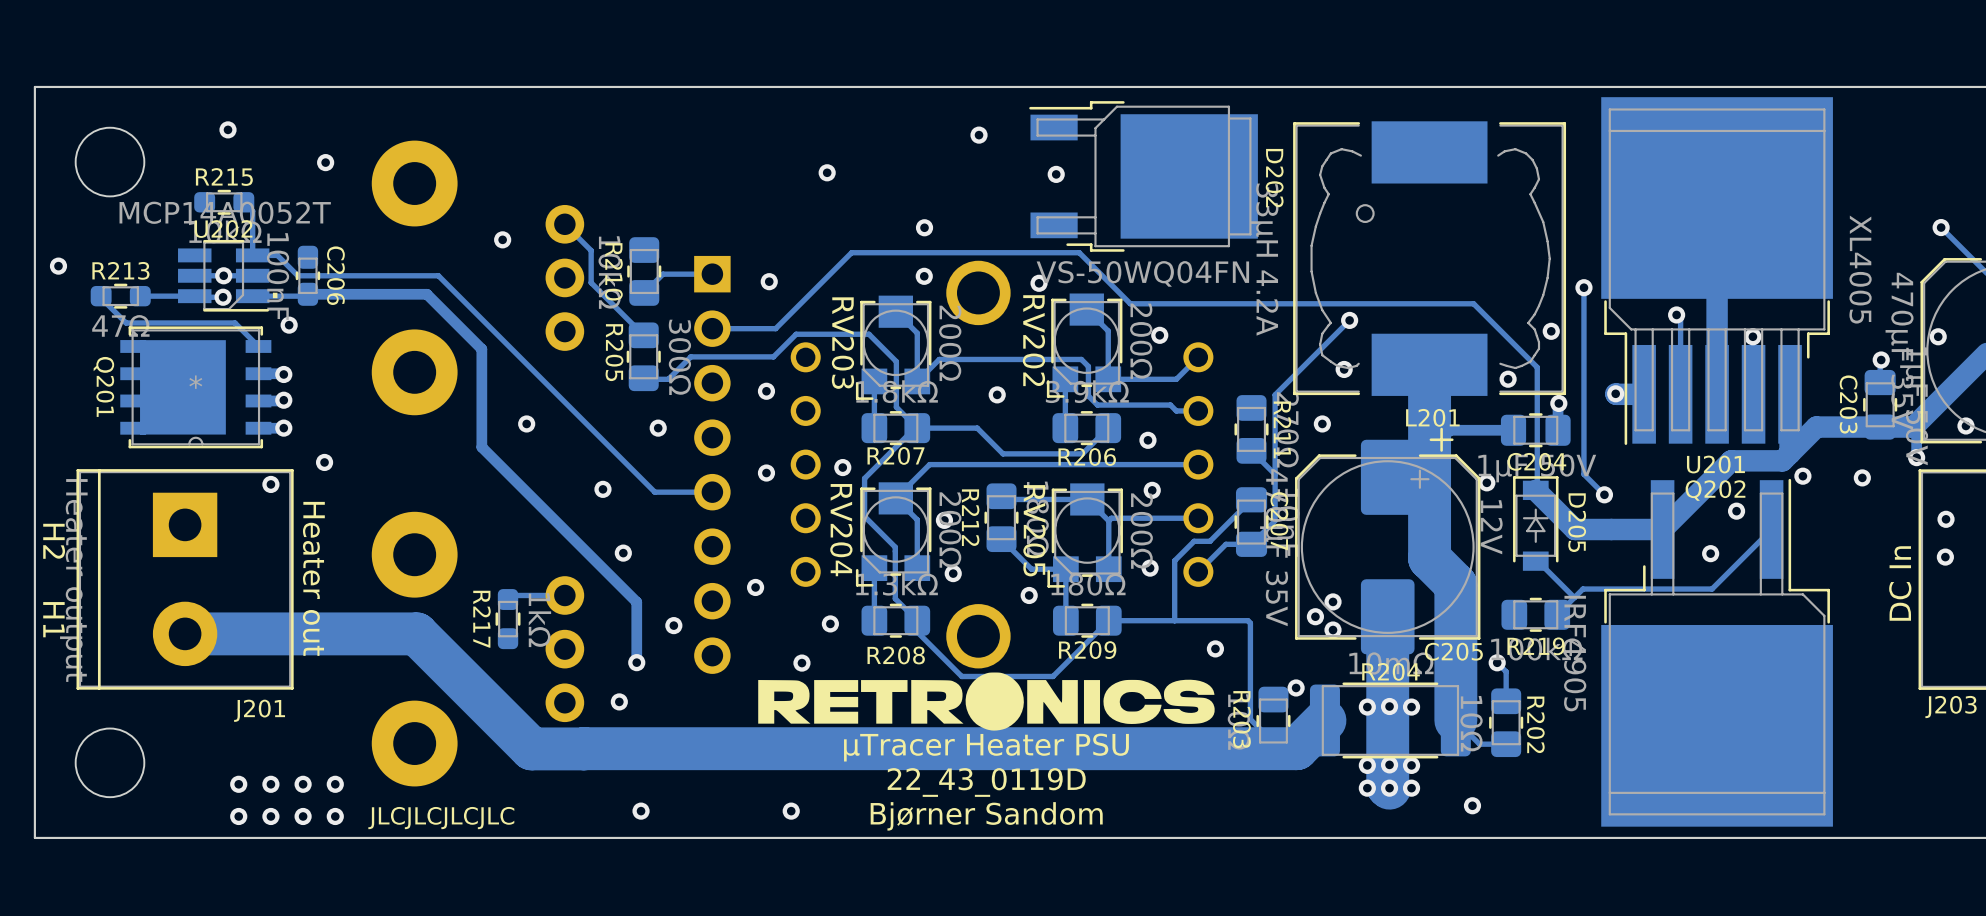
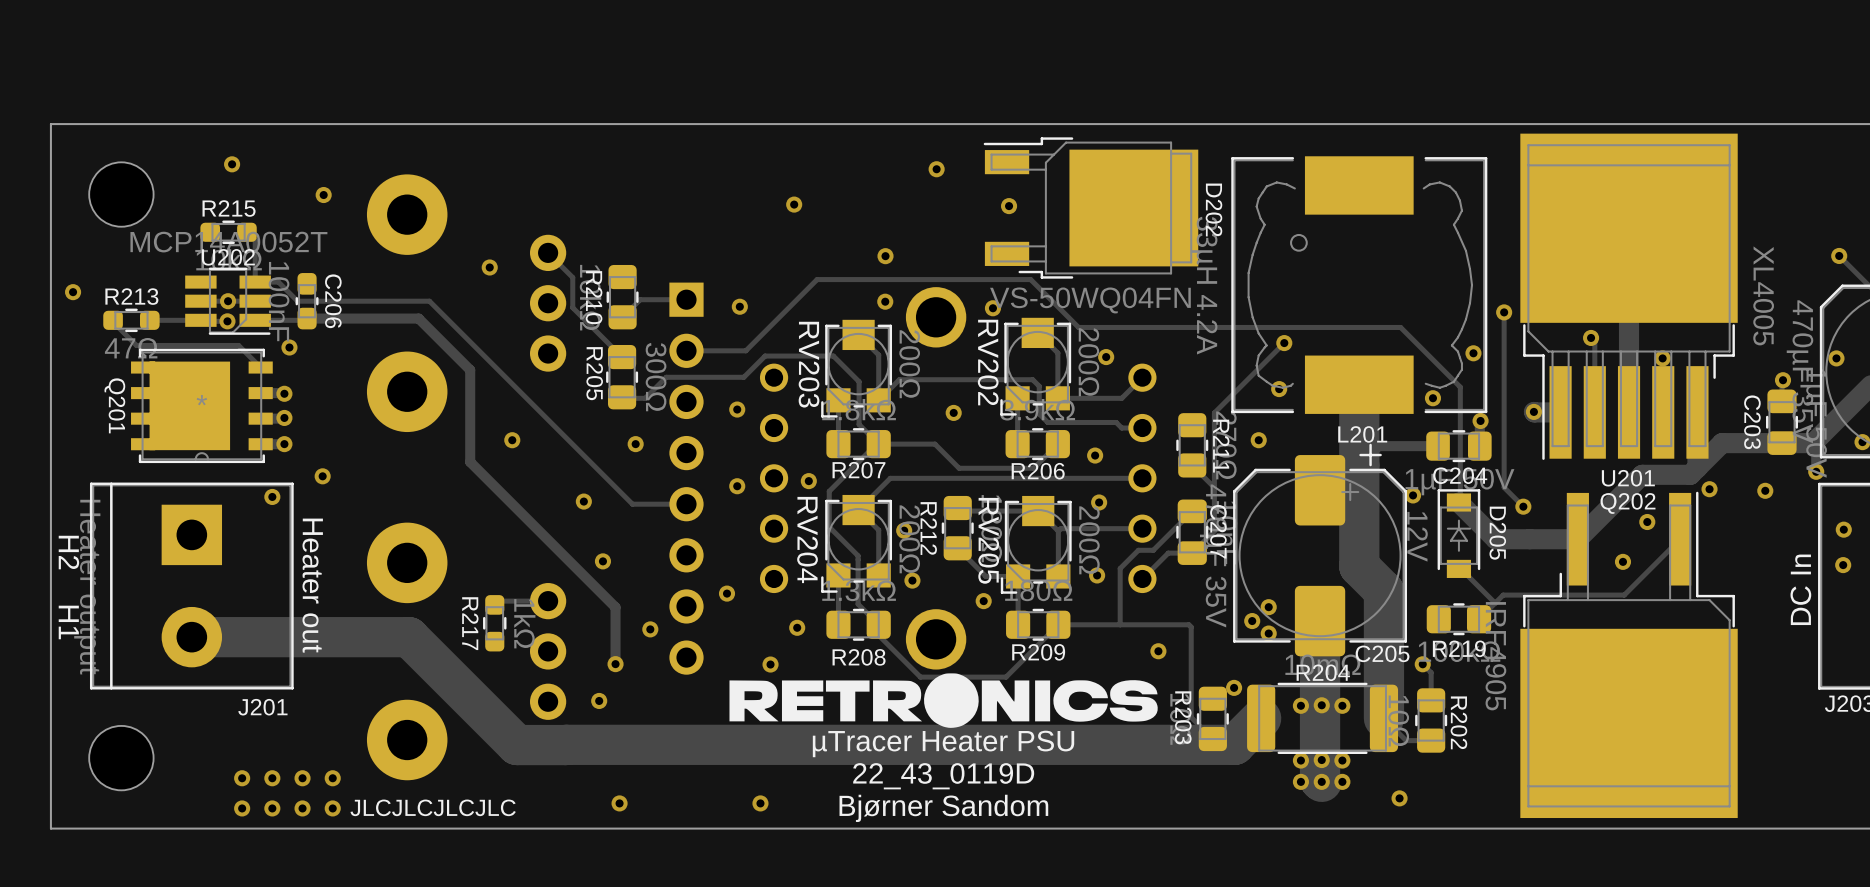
text: . (275, 295) -> none

